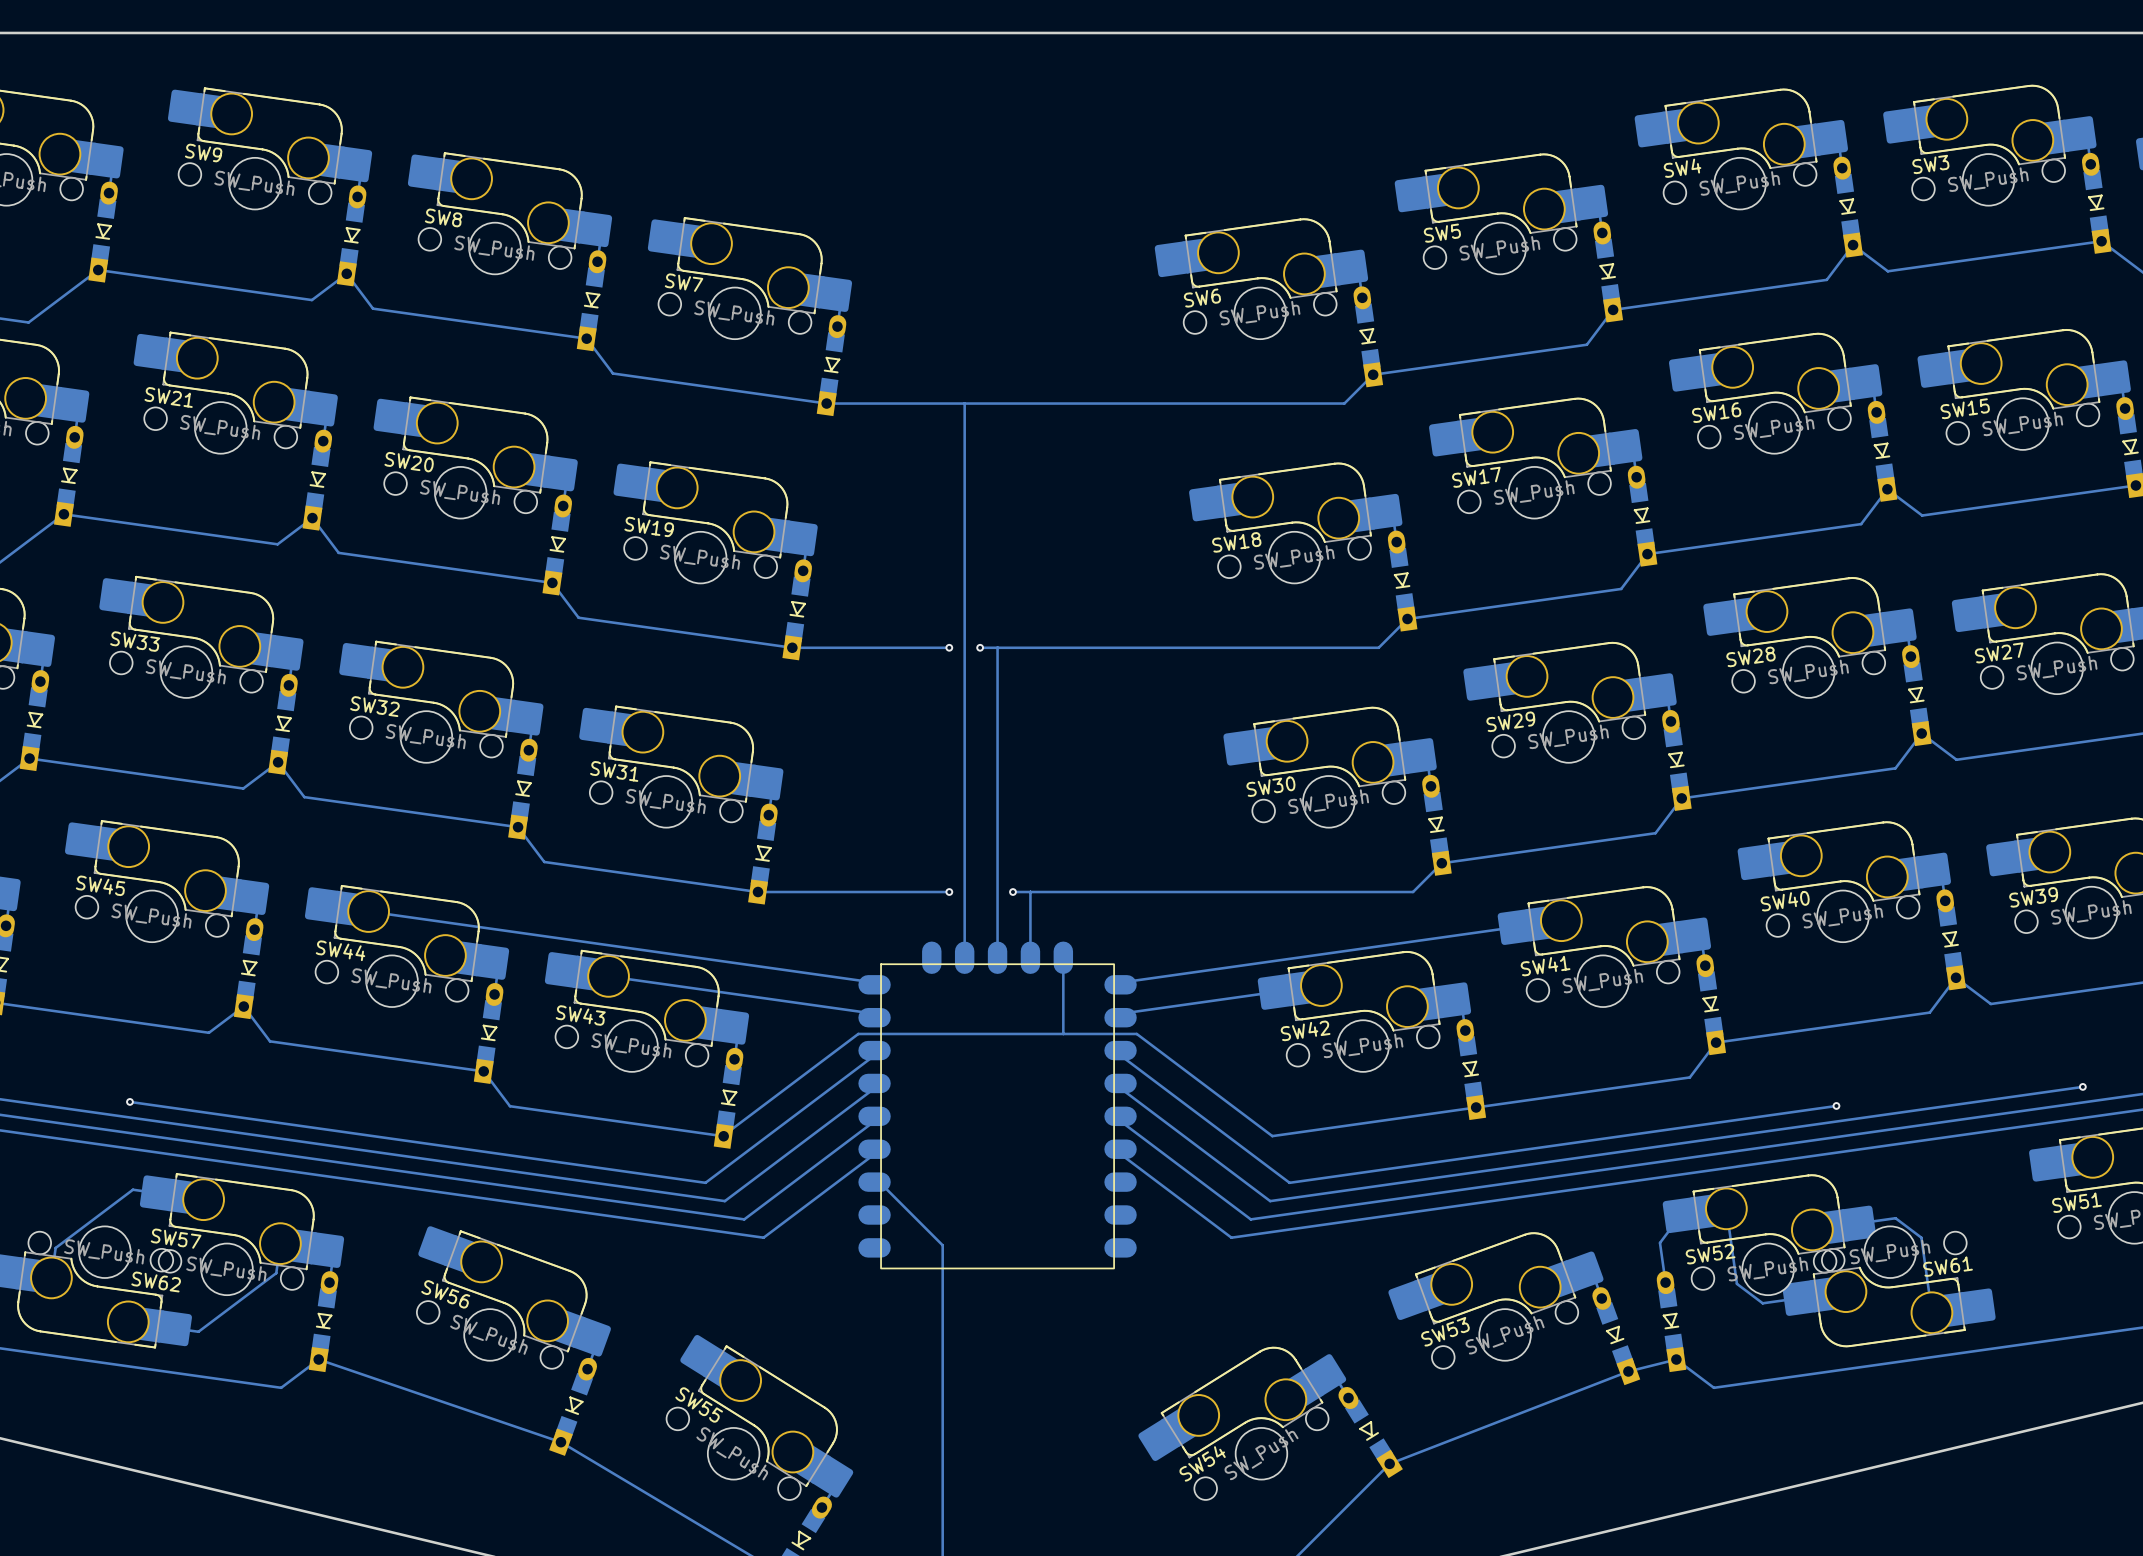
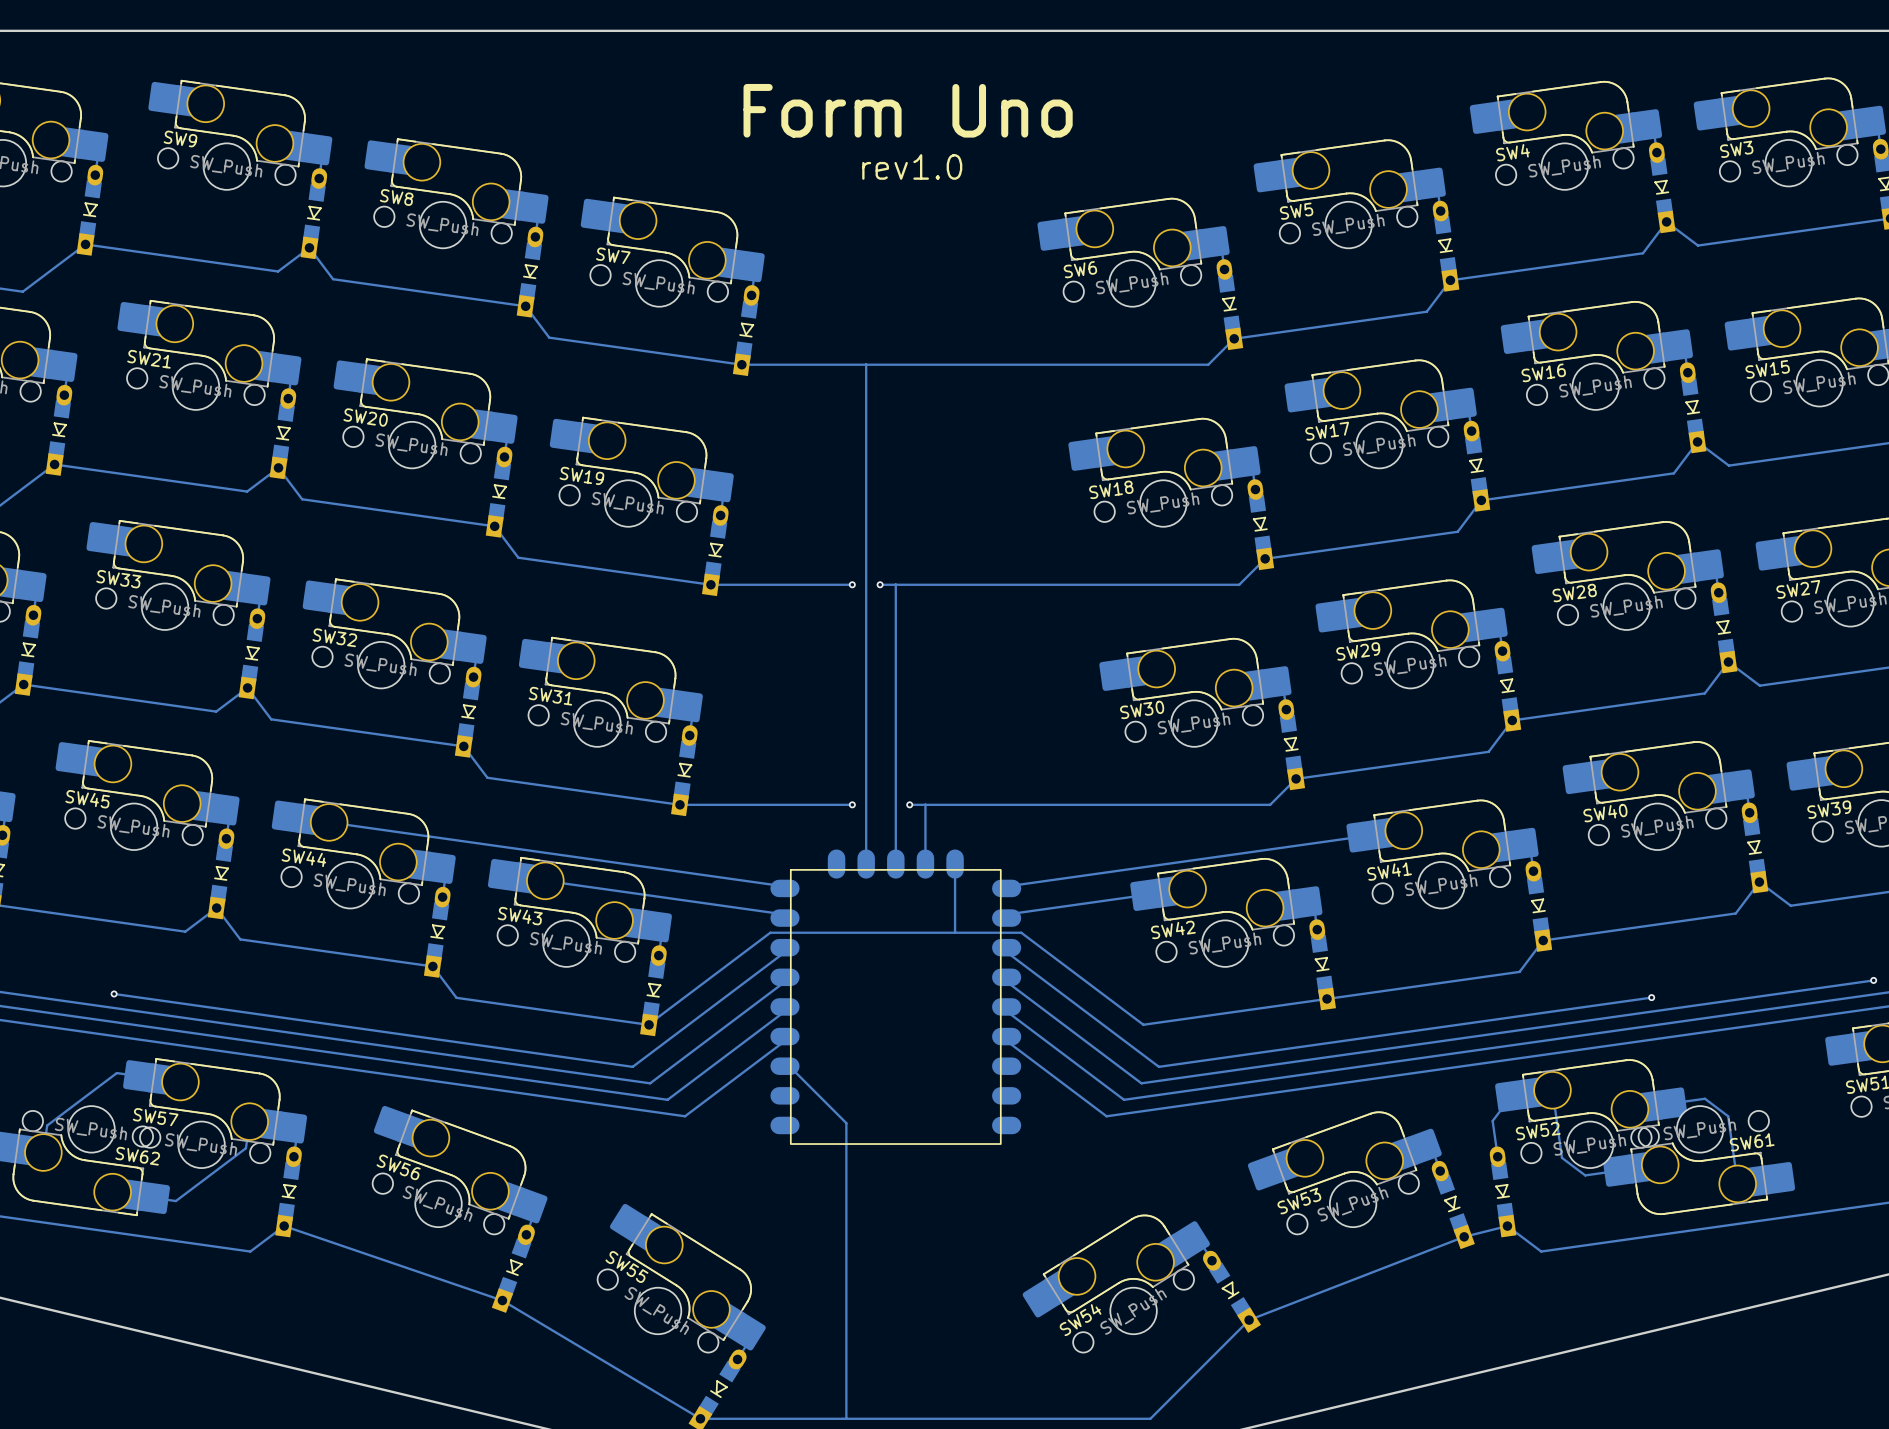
text: none -> Form Uno (908, 110)
text: none -> rev1.0 (912, 166)

